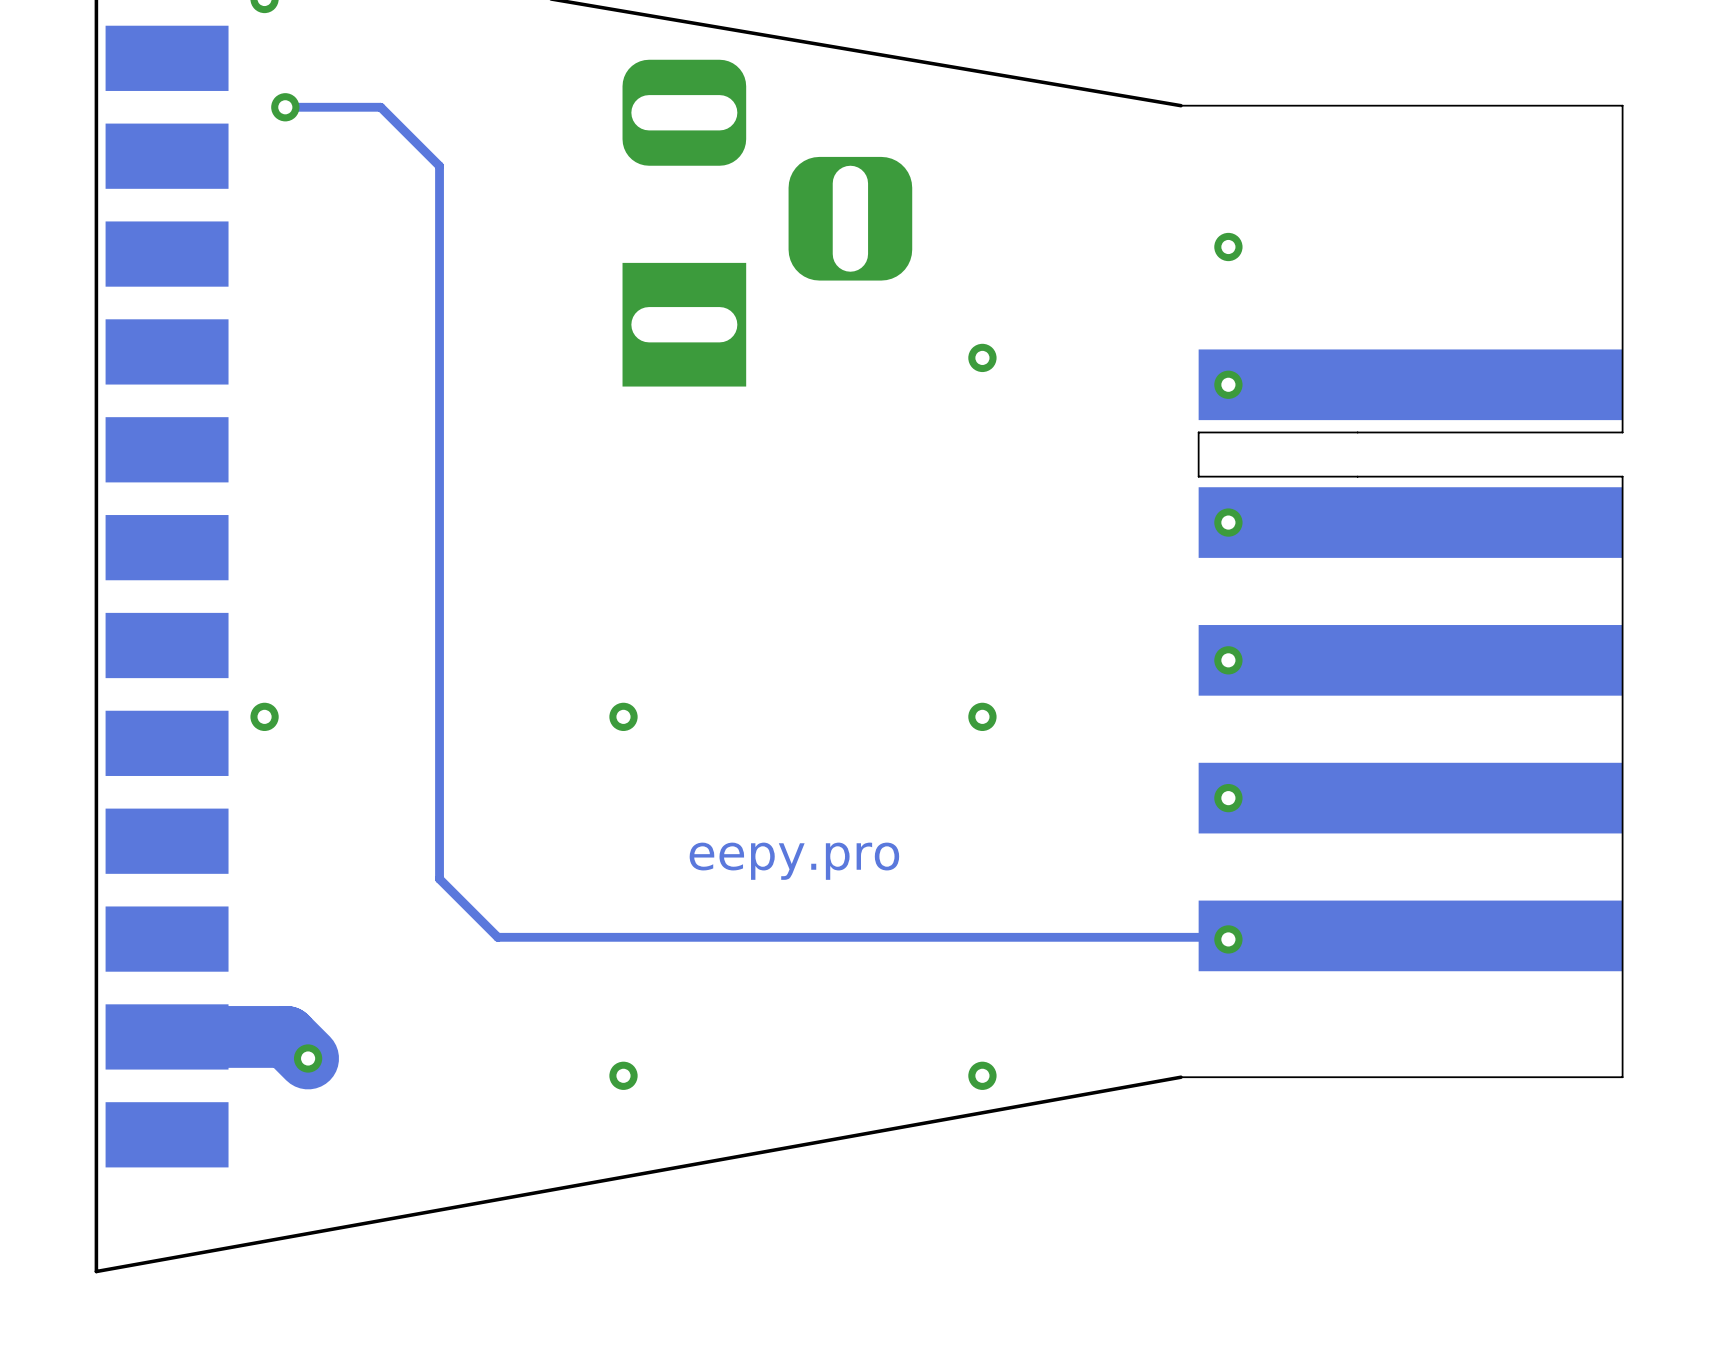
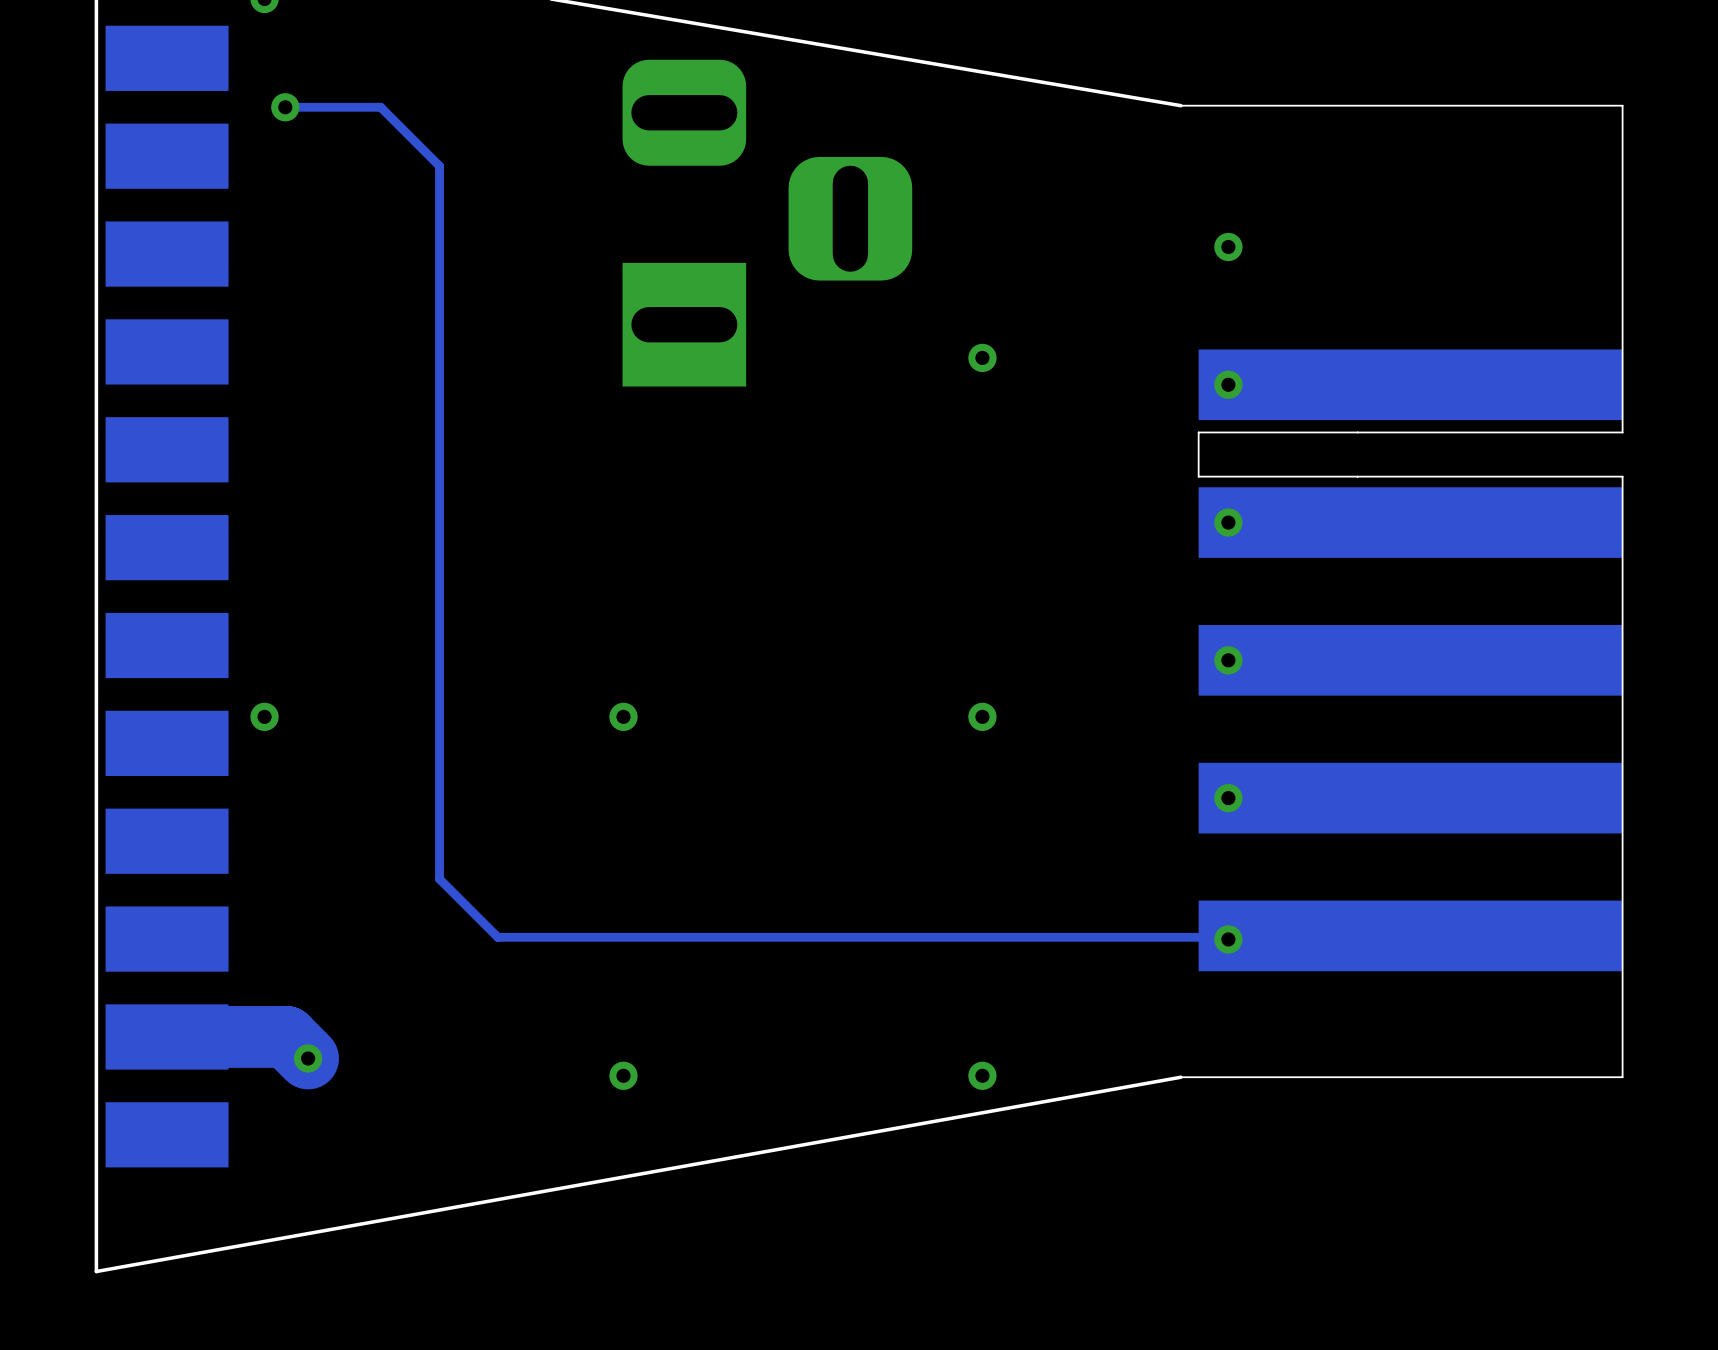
text: eepy.pro (794, 861) -> none

